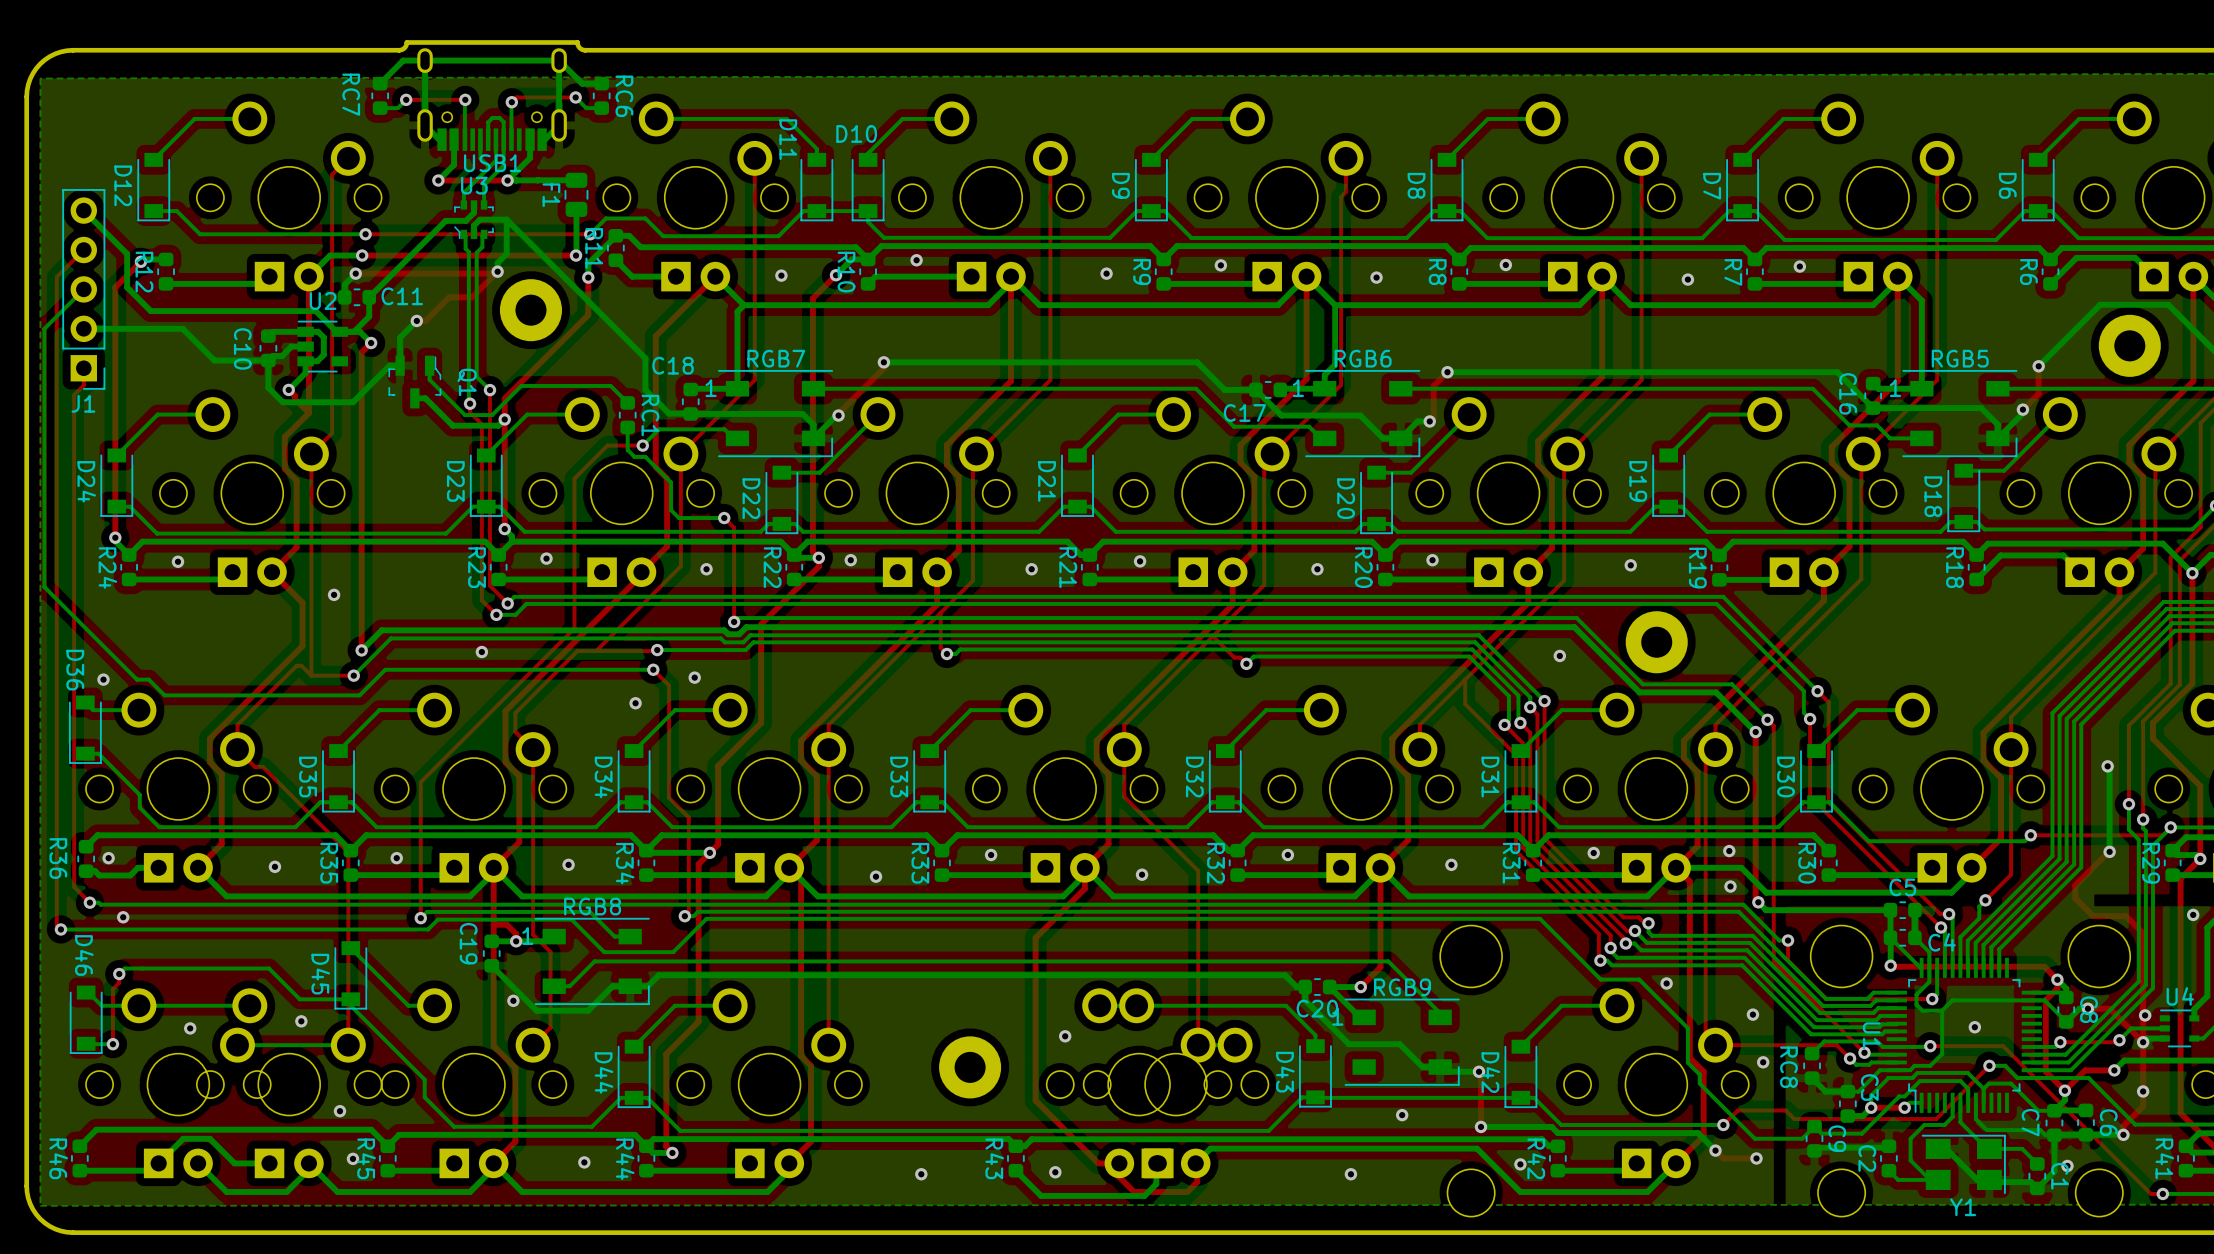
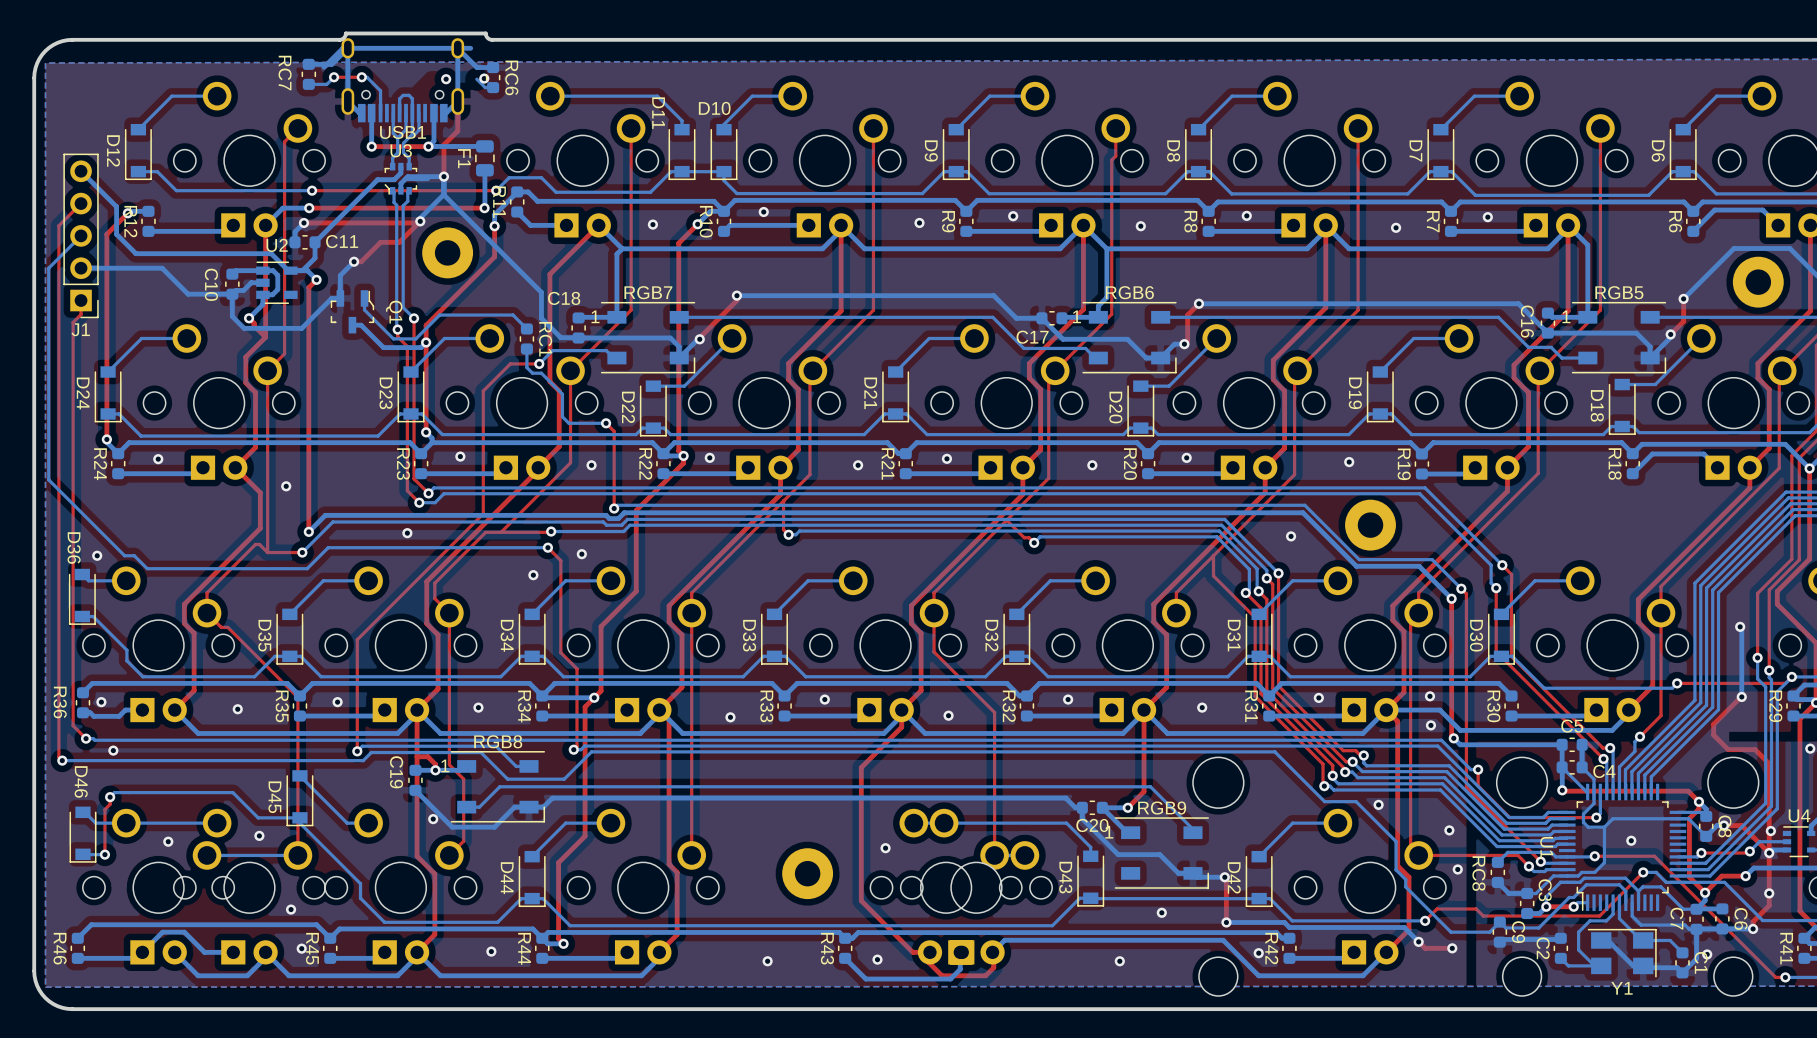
bottom track: (425, 60) (425, 125) (439, 139) (442, 139) -> none
bottom track: none -> (308, 64) (331, 64) (347, 48) (347, 101) (361, 113)
bottom track: (601, 83) (582, 83) (559, 60) (559, 125) (544, 139) (542, 139) -> none
bottom track: none -> (493, 67) (477, 67) (457, 48) (457, 101) (443, 113)
RC7 position: (380, 95) -> (308, 74)
bottom track: none -> (334, 77) (326, 84) (308, 84)
via: none -> (334, 77)
bottom track: none -> (361, 77) (366, 77) (380, 90) (380, 113)
top track: none -> (361, 77) (334, 77)
via: none -> (361, 77)
RC6 position: (601, 95) -> (493, 77)
bottom track: (575, 97) (586, 108) (601, 108) -> none
top track: (575, 97) (516, 97) (511, 102) -> none
bottom track: none -> (476, 79) (485, 87) (493, 87)
bottom track: (406, 99) (397, 108) (380, 108) -> none
via: (406, 99) -> none
bottom track: (465, 99) (464, 139) -> none
top track: (465, 99) (406, 99) -> none
via: (465, 99) -> none
USB1 position: (492, 99) -> (402, 80)
bottom track: (511, 102) (511, 139) -> none
via position: (511, 102) -> (446, 79)
top track: none -> (457, 101) (457, 131) (443, 144) (443, 176)
bottom track: (454, 139) (454, 164) (438, 180) -> (371, 113) (371, 146)
bottom track: (480, 139) (480, 158) (489, 167) (463, 194) -> (393, 113) (393, 133) (397, 137) (397, 152) (392, 157)
bottom track: none -> (406, 113) (406, 129) (397, 138)
bottom track: (488, 139) (488, 122) (492, 117) (499, 117) (503, 122) (503, 165) (484, 185) (484, 194) -> (399, 113) (399, 98) (403, 95) (408, 95) (412, 98) (412, 134) (403, 143) (403, 152) (409, 158)
bottom track: (530, 139) (530, 158) (514, 173) -> (433, 113) (433, 141)
via: none -> (443, 176)
bottom track: none -> (405, 178) (407, 176) (443, 176) (443, 194)
bottom track: (526, 239) (506, 219) (506, 253) (497, 262) (497, 267) -> (443, 194) (420, 218)

